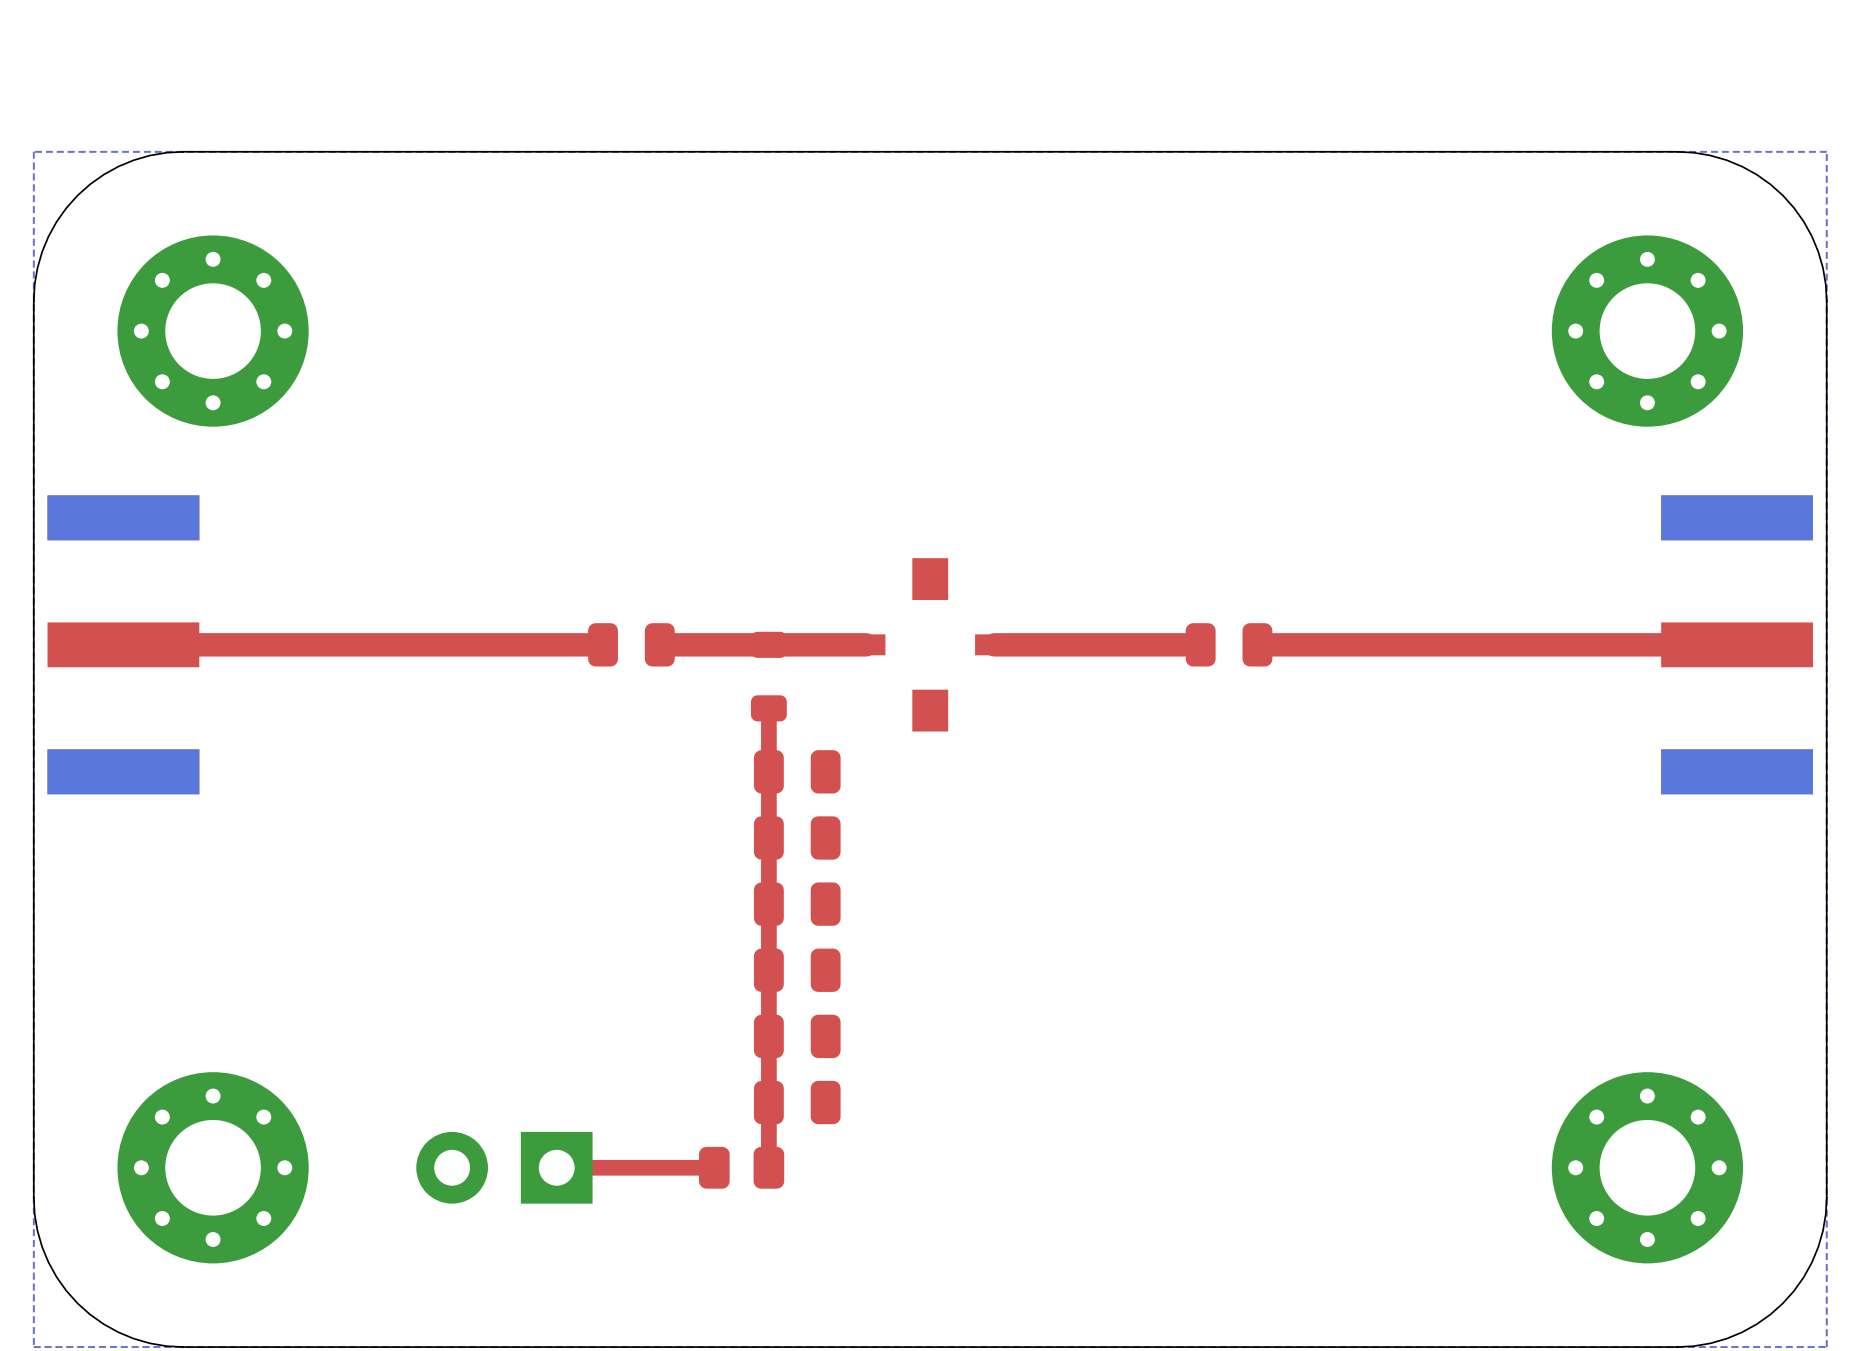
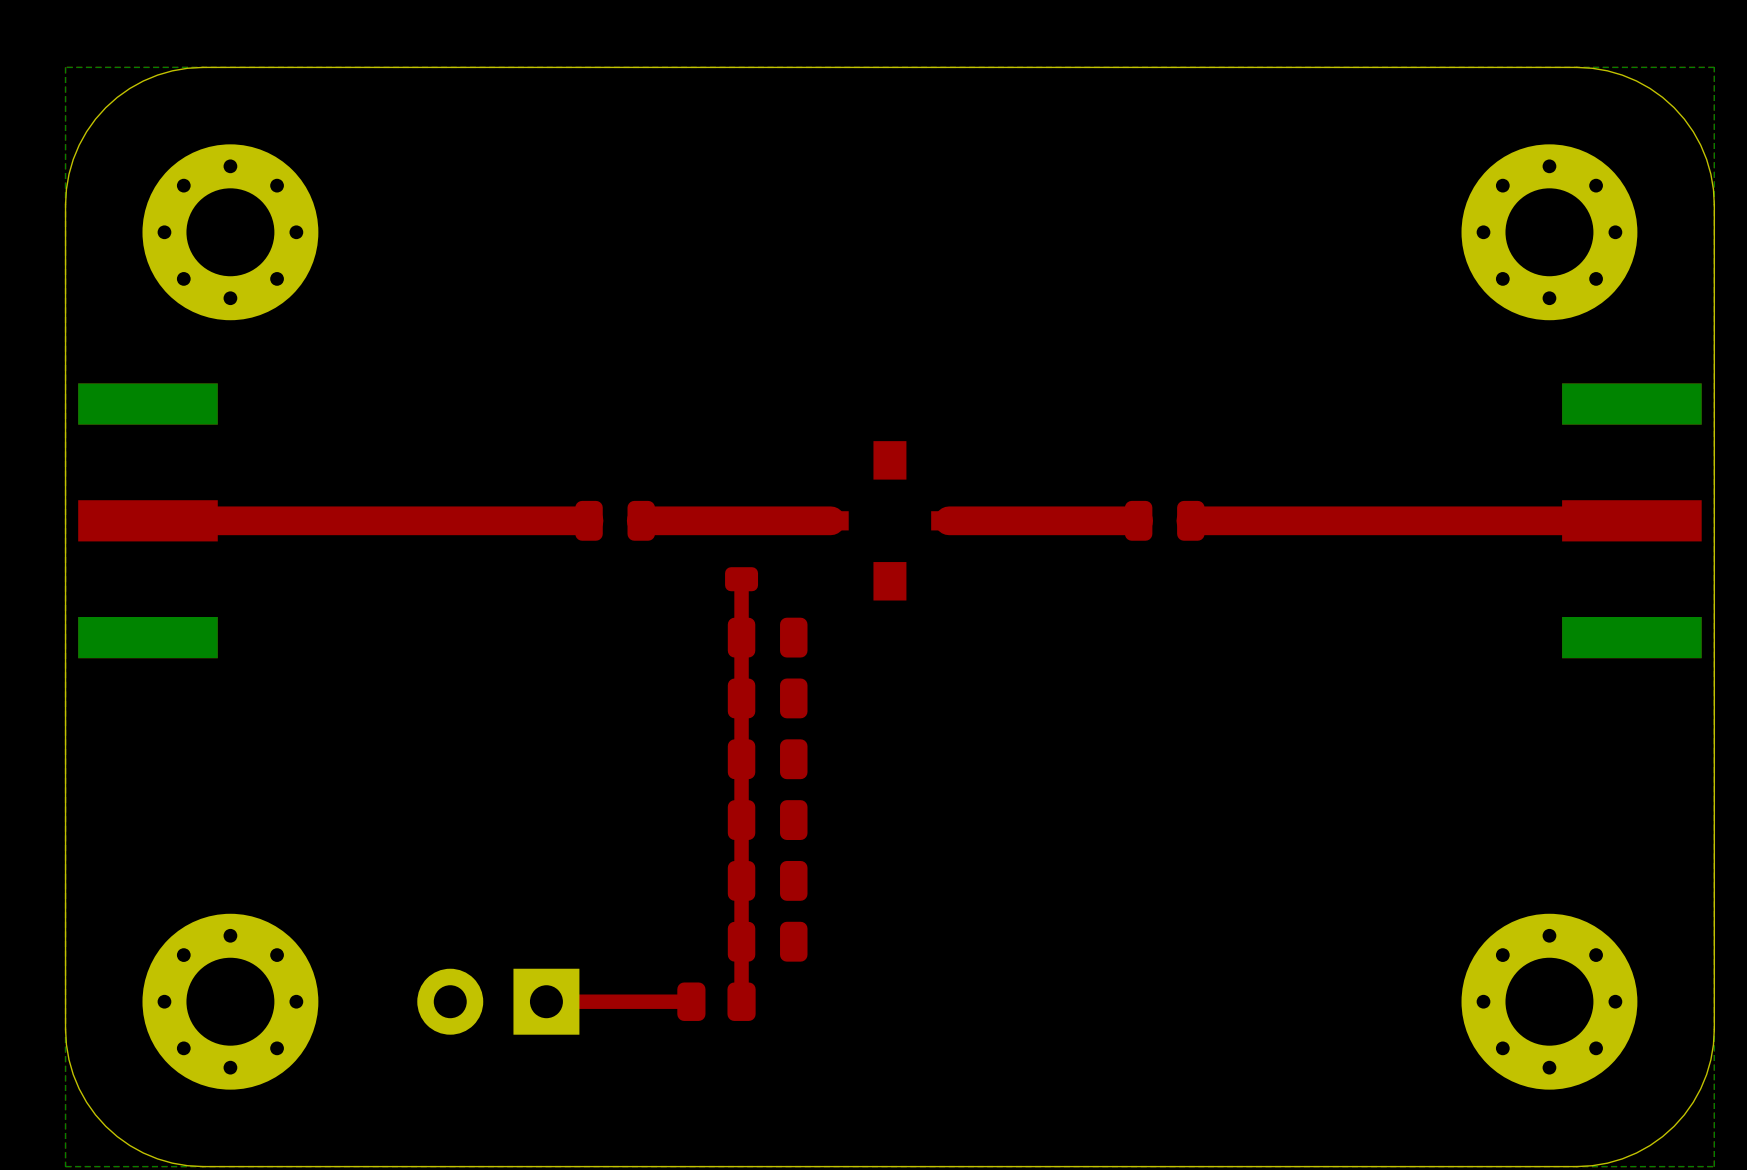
top track width: thin (603, 644) (123, 644) -> thick (589, 520) (147, 520)
top track width: thin (865, 644) (659, 644) -> thick (830, 520) (641, 520)
top track width: thin (1200, 644) (994, 644) -> thick (1138, 520) (949, 520)
top track width: thin (1737, 644) (1257, 644) -> thick (1631, 520) (1190, 520)

